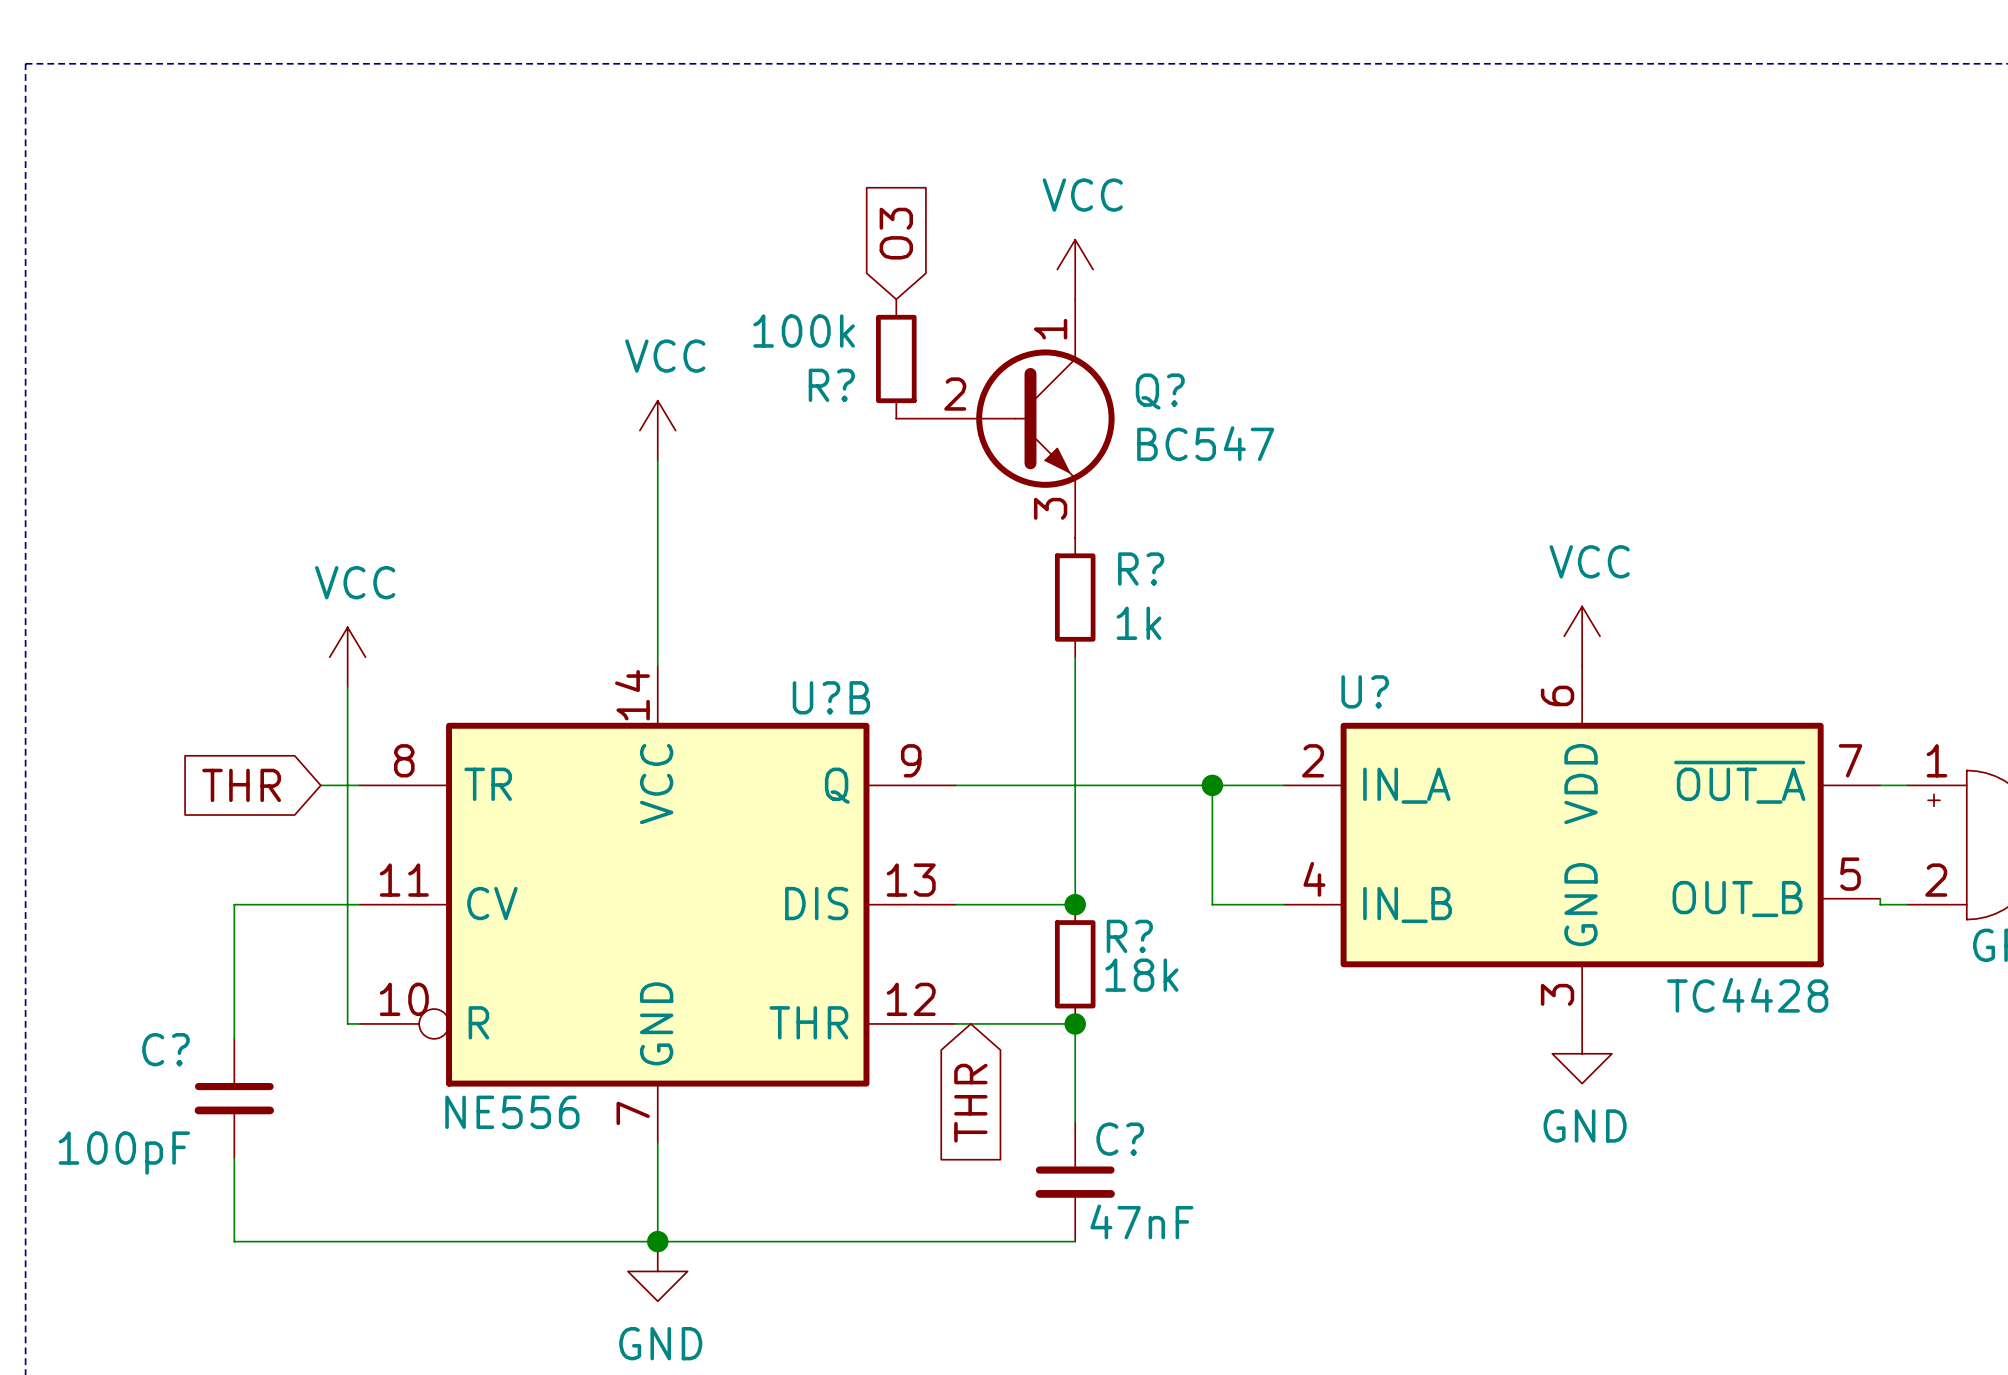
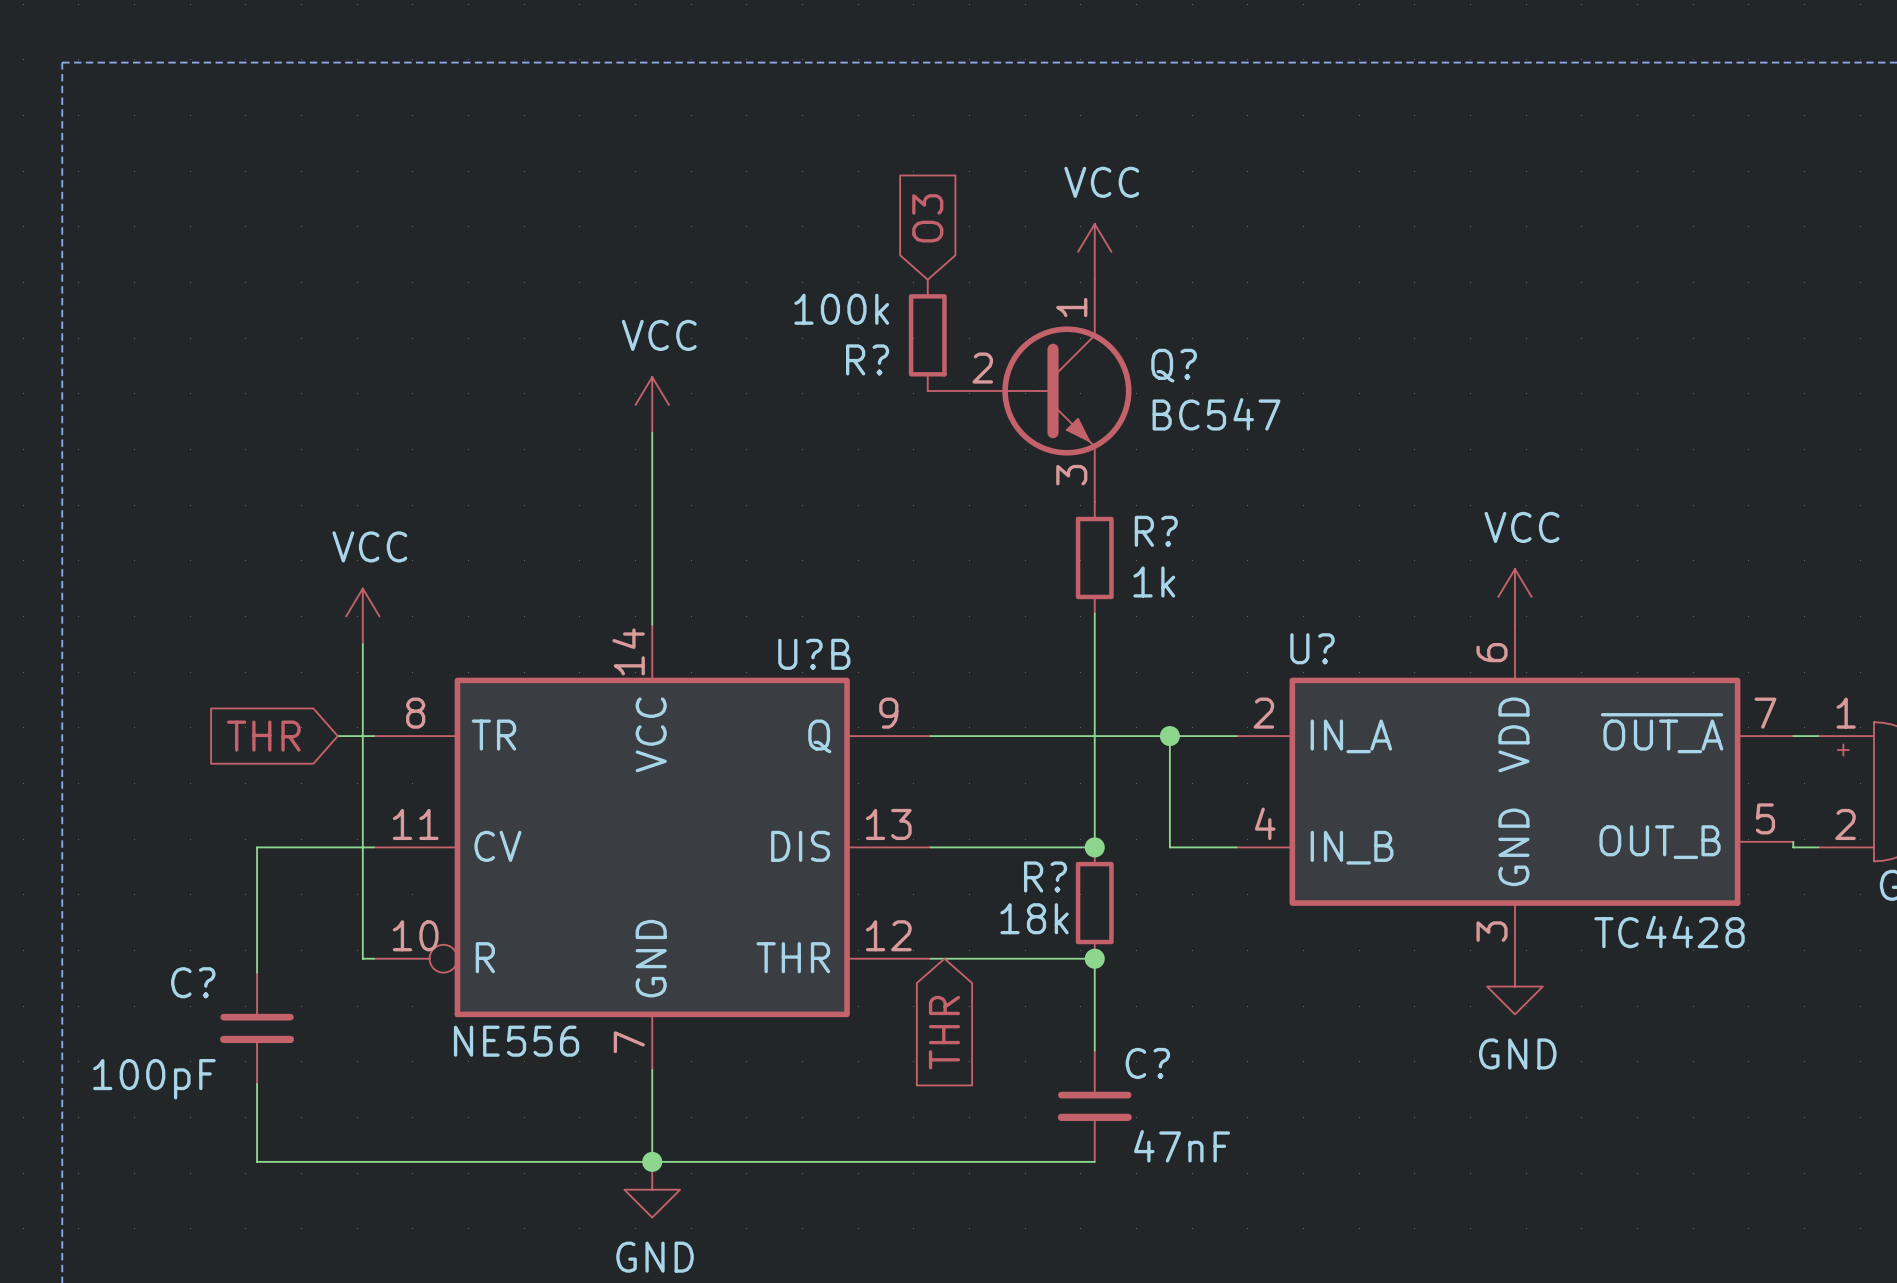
global label position: O3 (896, 233) -> O3 (927, 218)
power symbol position: VCC (1075, 269) -> VCC (1094, 251)
R? position: (896, 359) -> (927, 335)
Q? position: (1005, 418) -> (1029, 390)
R? position: (1075, 597) -> (1094, 557)
wire: (1075, 657) (1075, 904) -> (1094, 613) (1094, 847) (1041, 847)
junction position: (1075, 904) -> (1094, 847)
R? name position: R? (1129, 936) -> R? (1045, 876)
R? position: (1075, 964) -> (1094, 903)
R? value position: 18k (1141, 975) -> 18k (1034, 918)
wire: (1075, 1023) (1075, 1122) -> (1041, 958) (1094, 958) (1094, 1050)
junction position: (1075, 1023) -> (1094, 958)
C? name position: C? (1120, 1139) -> C? (1147, 1063)
C? position: (1075, 1181) -> (1094, 1106)
C? value position: 47nF (1141, 1221) -> 47nF (1182, 1146)
wire: none -> (1041, 1161) (1094, 1161)

